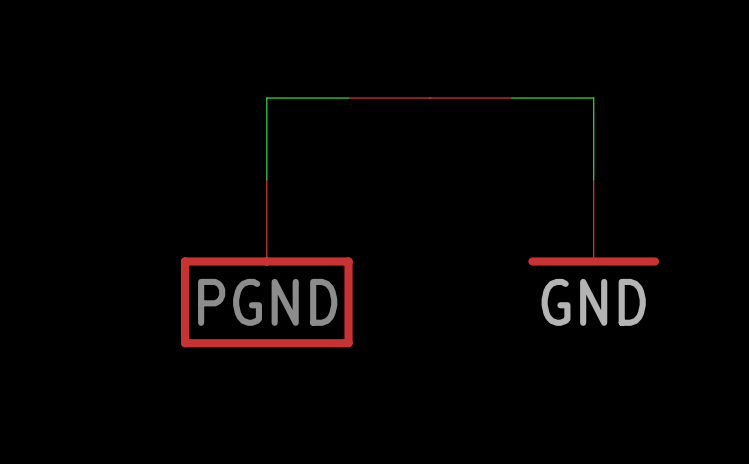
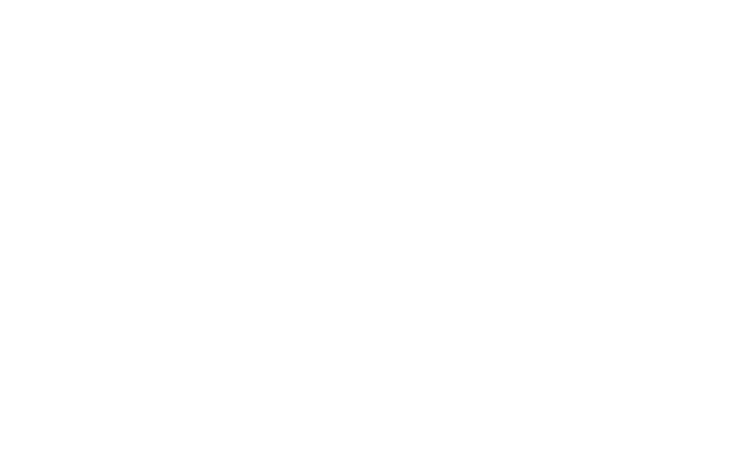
wire: (348, 98) (266, 98) (266, 179) -> none
part: (430, 98) -> none
wire: (511, 98) (593, 98) (593, 179) -> none
power symbol: GND (593, 222) -> none
power symbol: PGND (266, 263) -> none

